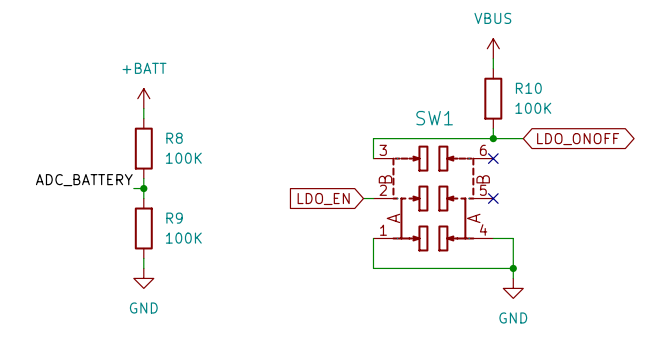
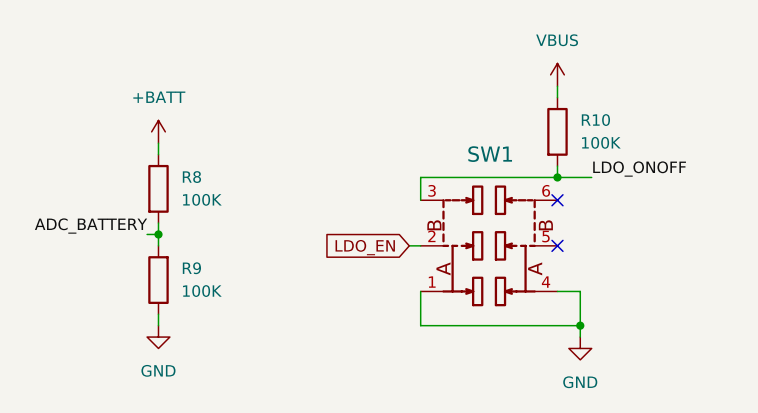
label: none -> LDO_ONOFF (639, 169)
global label: LDO_ONOFF (578, 139) -> none

